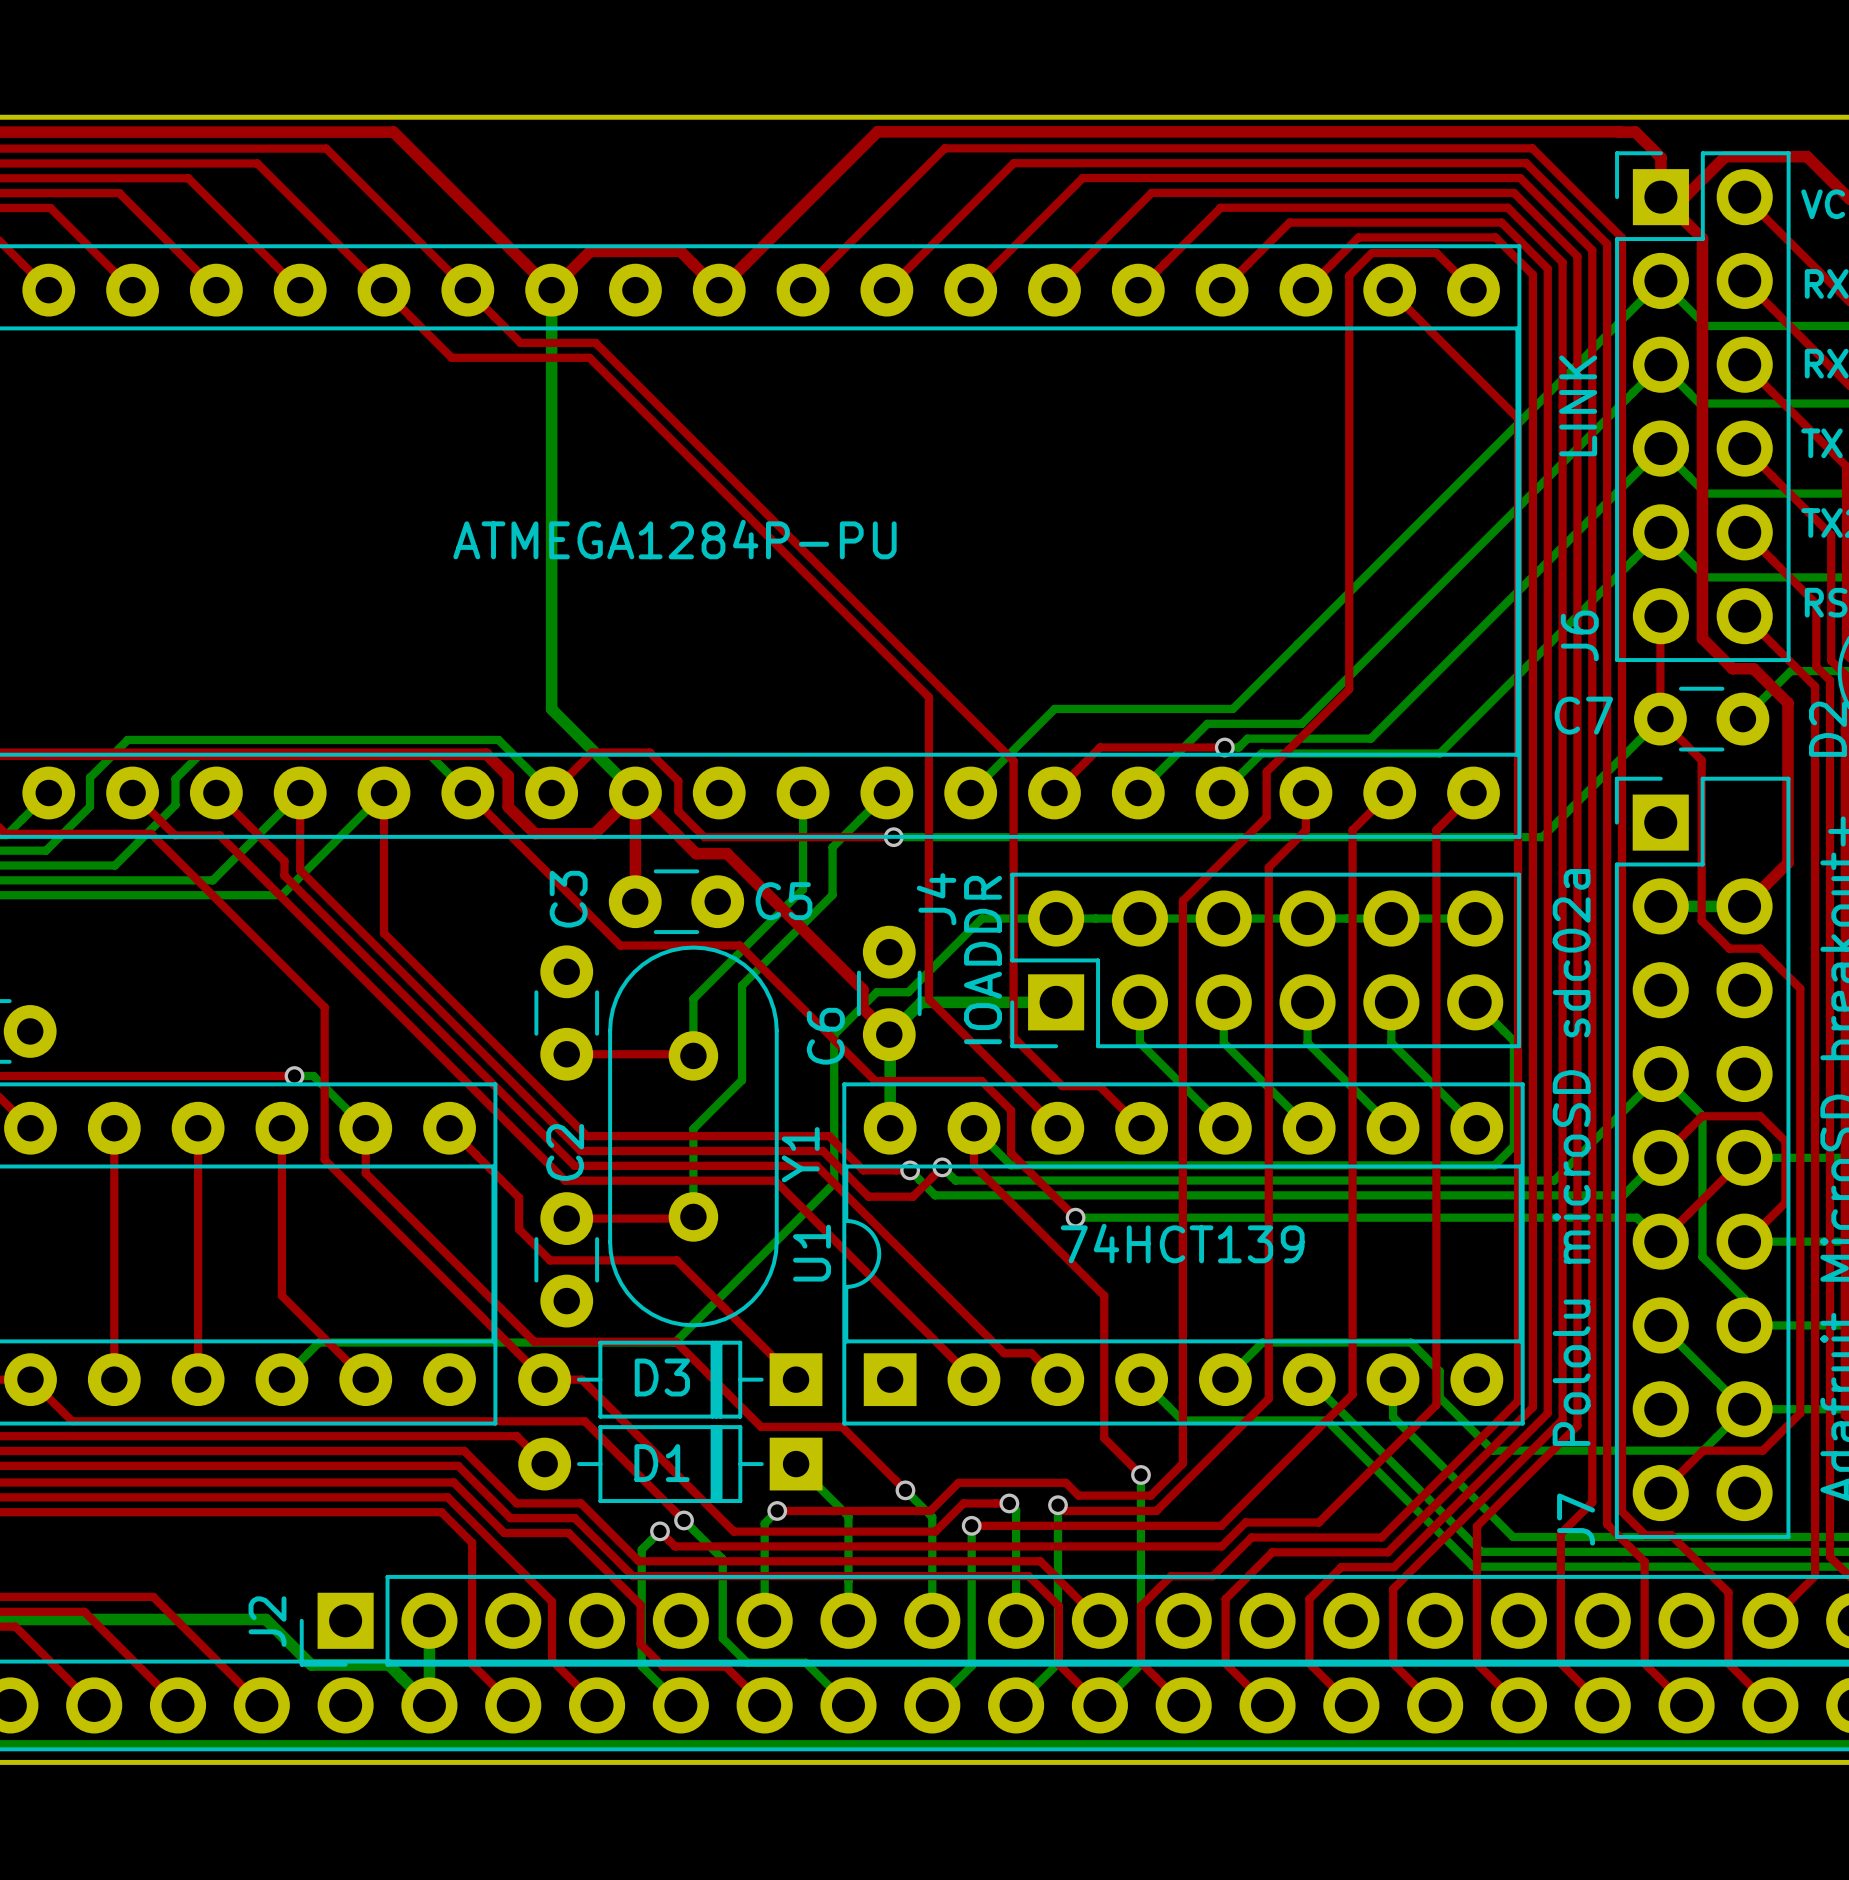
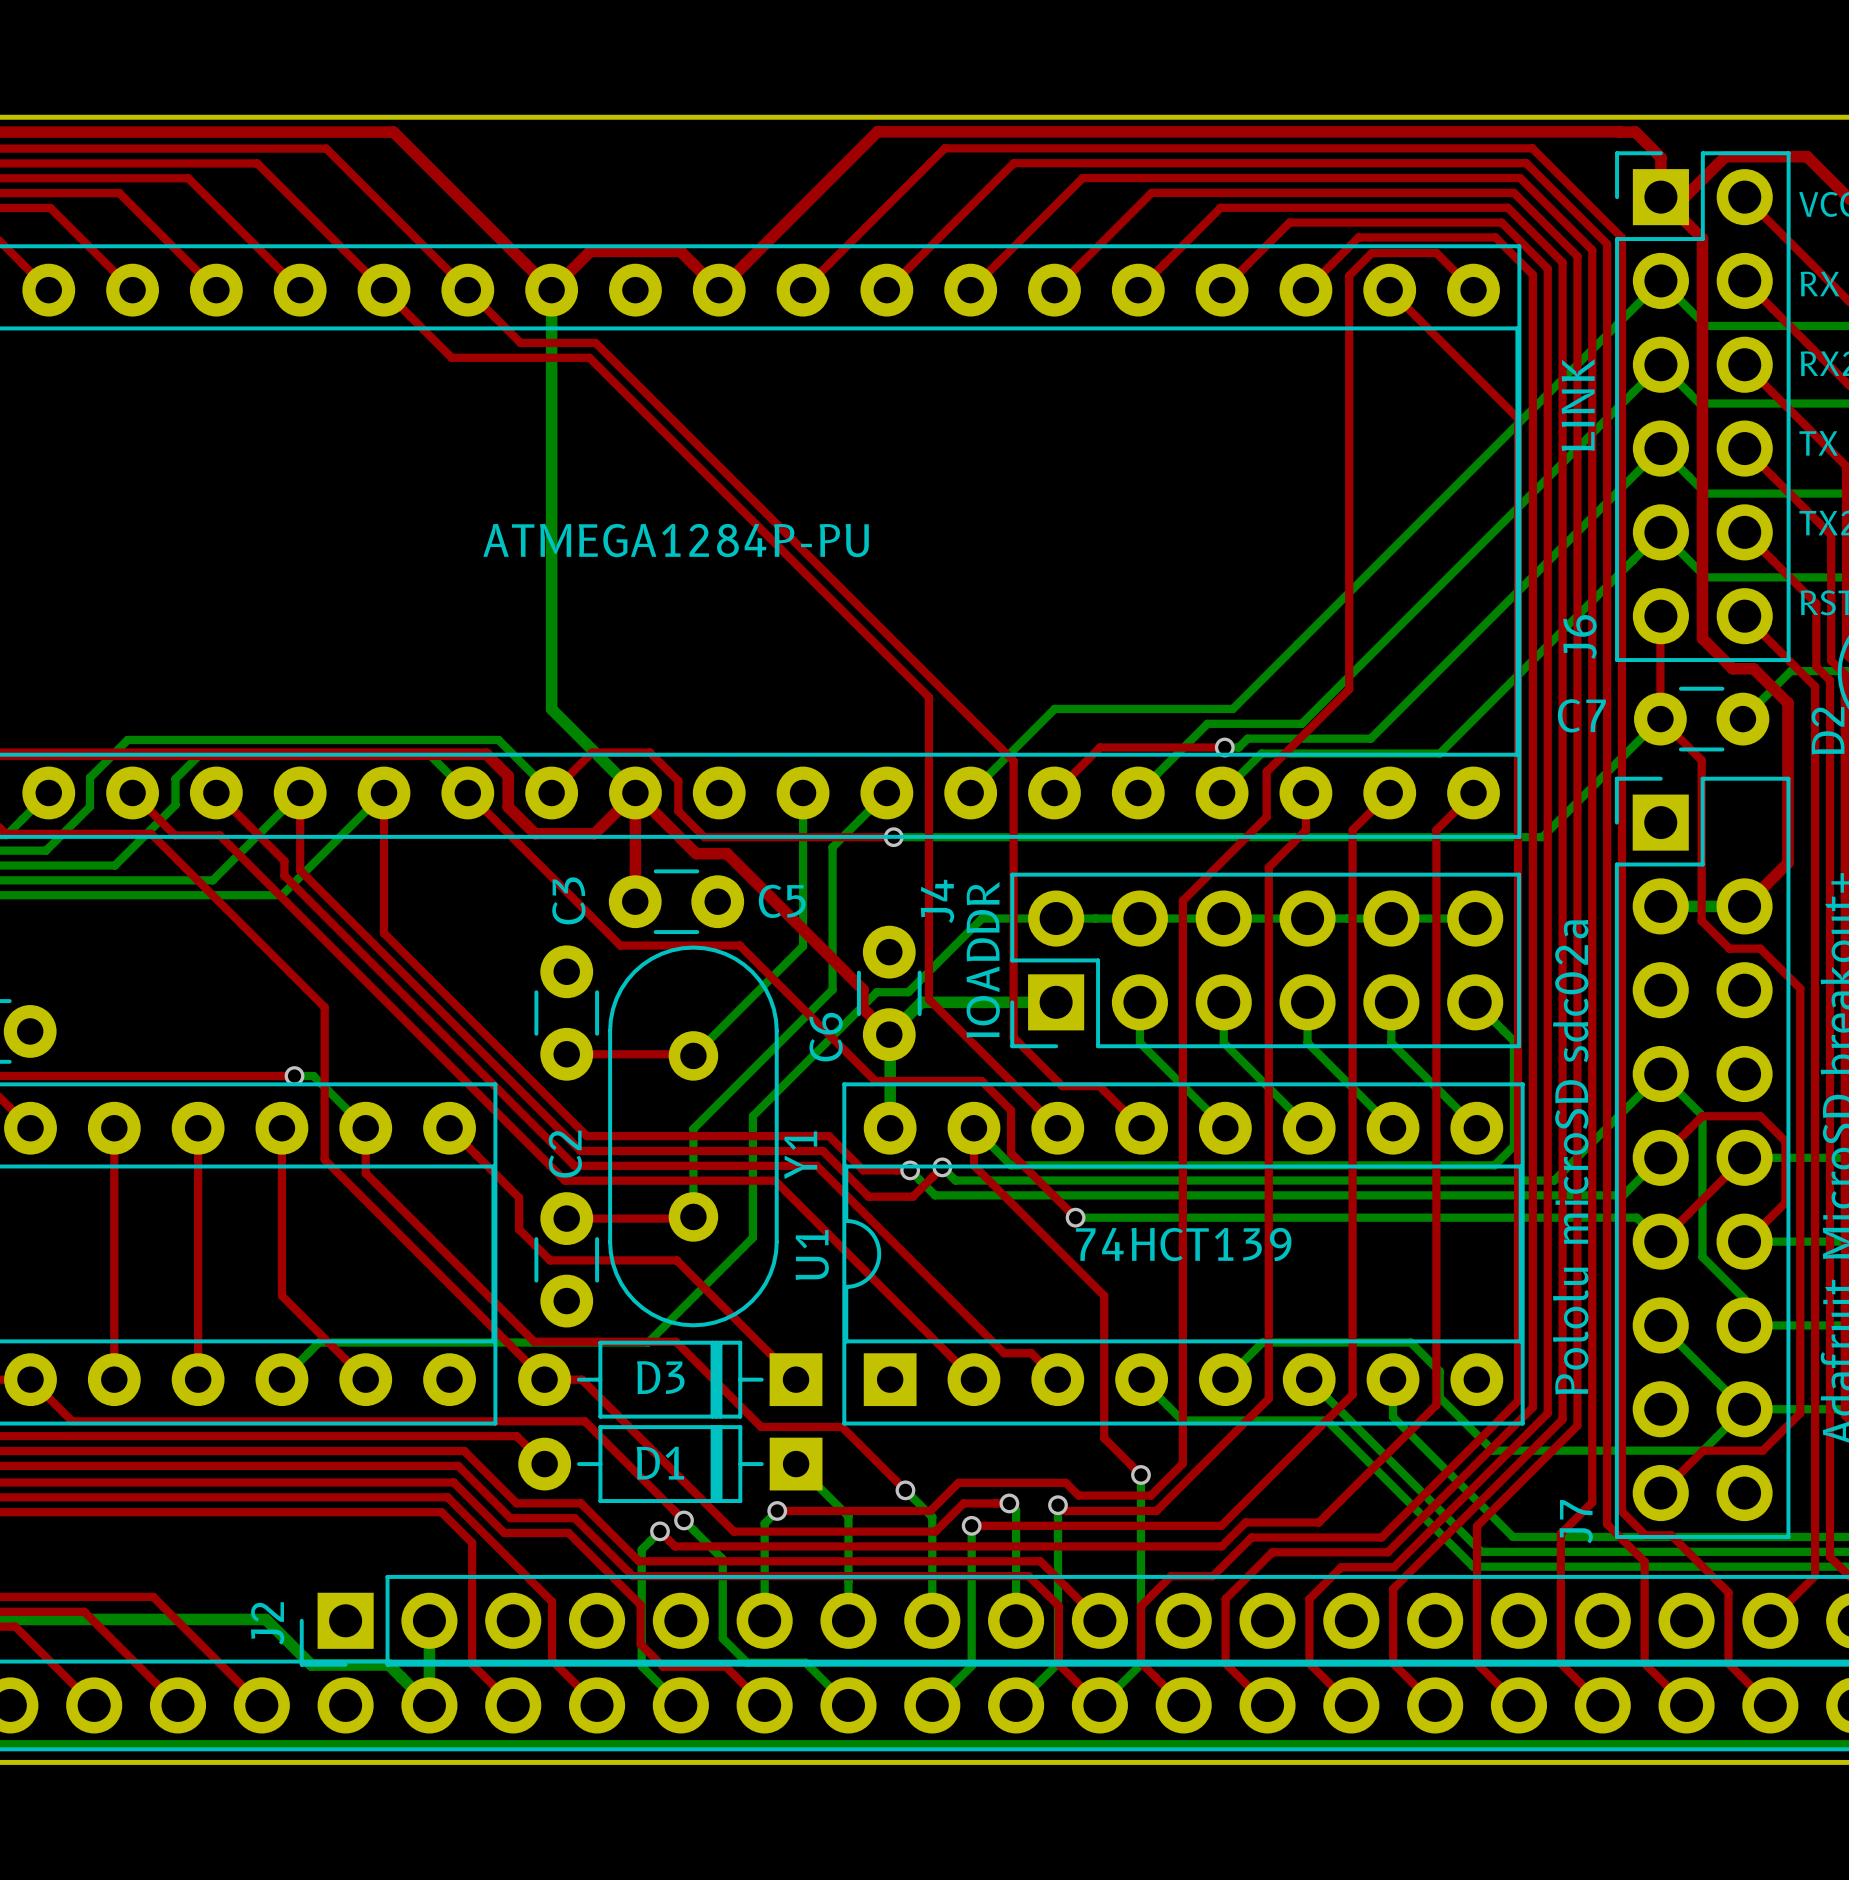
bottom track: (803, 889) (693, 998) (693, 1055) -> (803, 889) (803, 946) (693, 1055)
bottom track: (832, 895) (742, 985) (742, 1080) -> (832, 895) (832, 989) (742, 1080)
bottom track: (834, 1034) (834, 1183) (675, 1342) (648, 1342) -> (834, 1034) (752, 1116) (752, 1237) (648, 1342)

